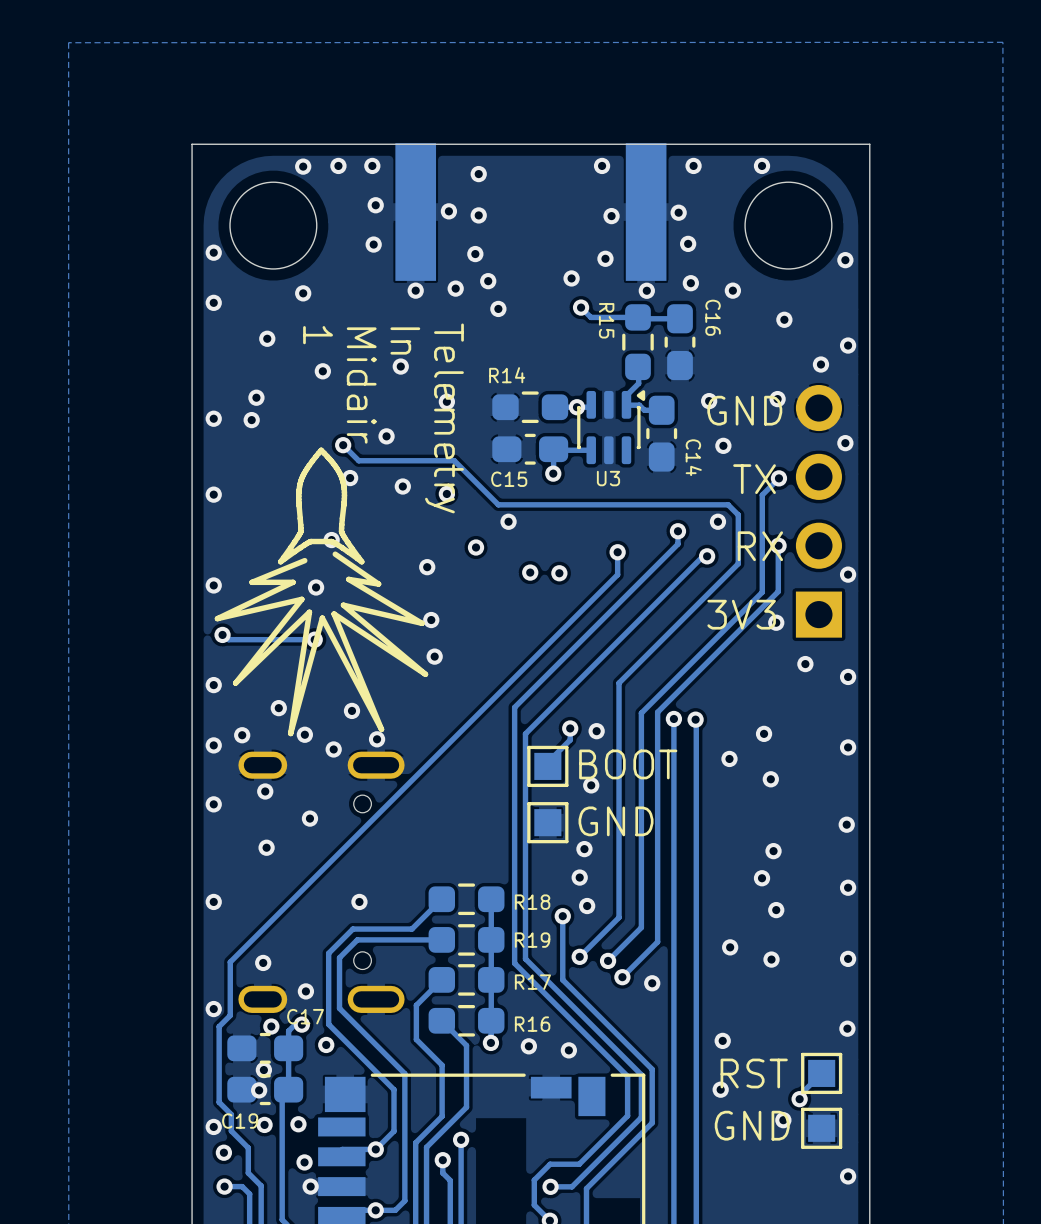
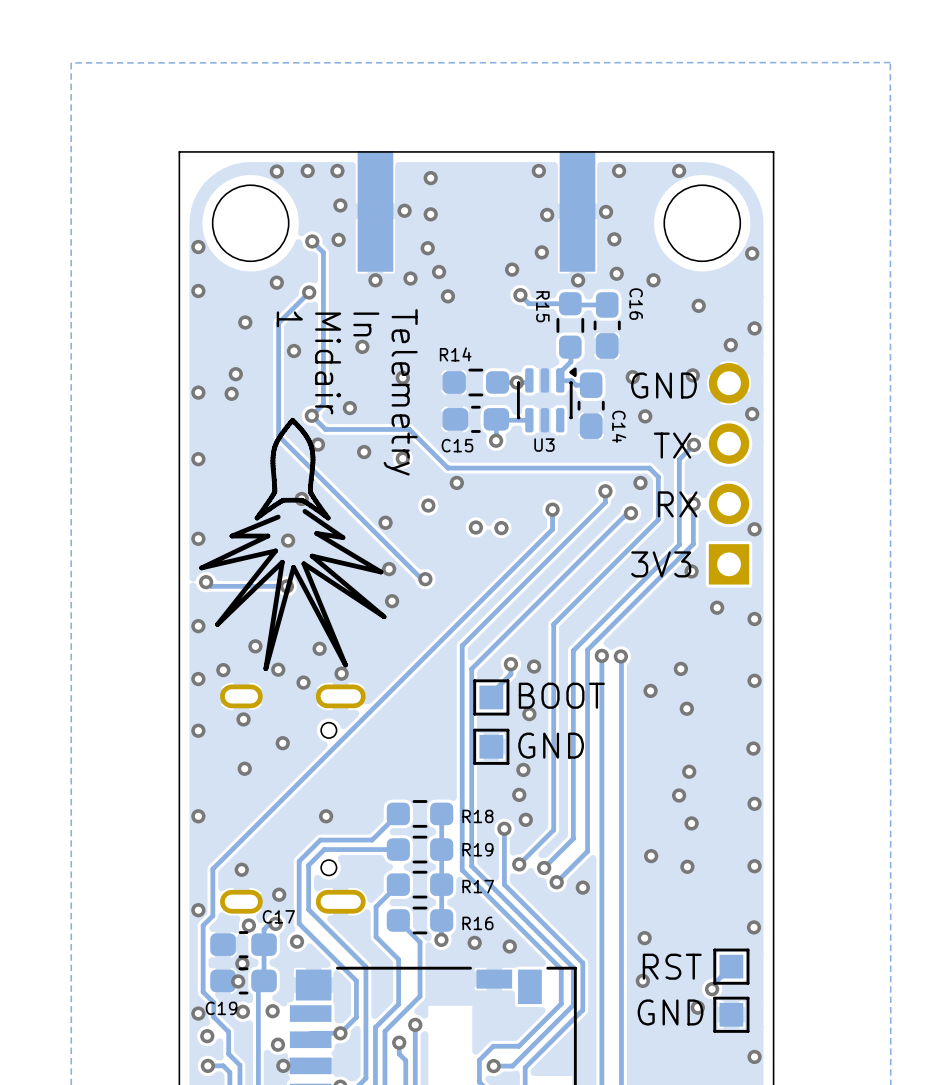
track: none -> (312, 241) (323, 252) (323, 404) (311, 415)
via: none -> (312, 241)
track: none -> (309, 292) (278, 323) (278, 435) (421, 579) (425, 579)
via: none -> (309, 292)
via: none -> (425, 579)

